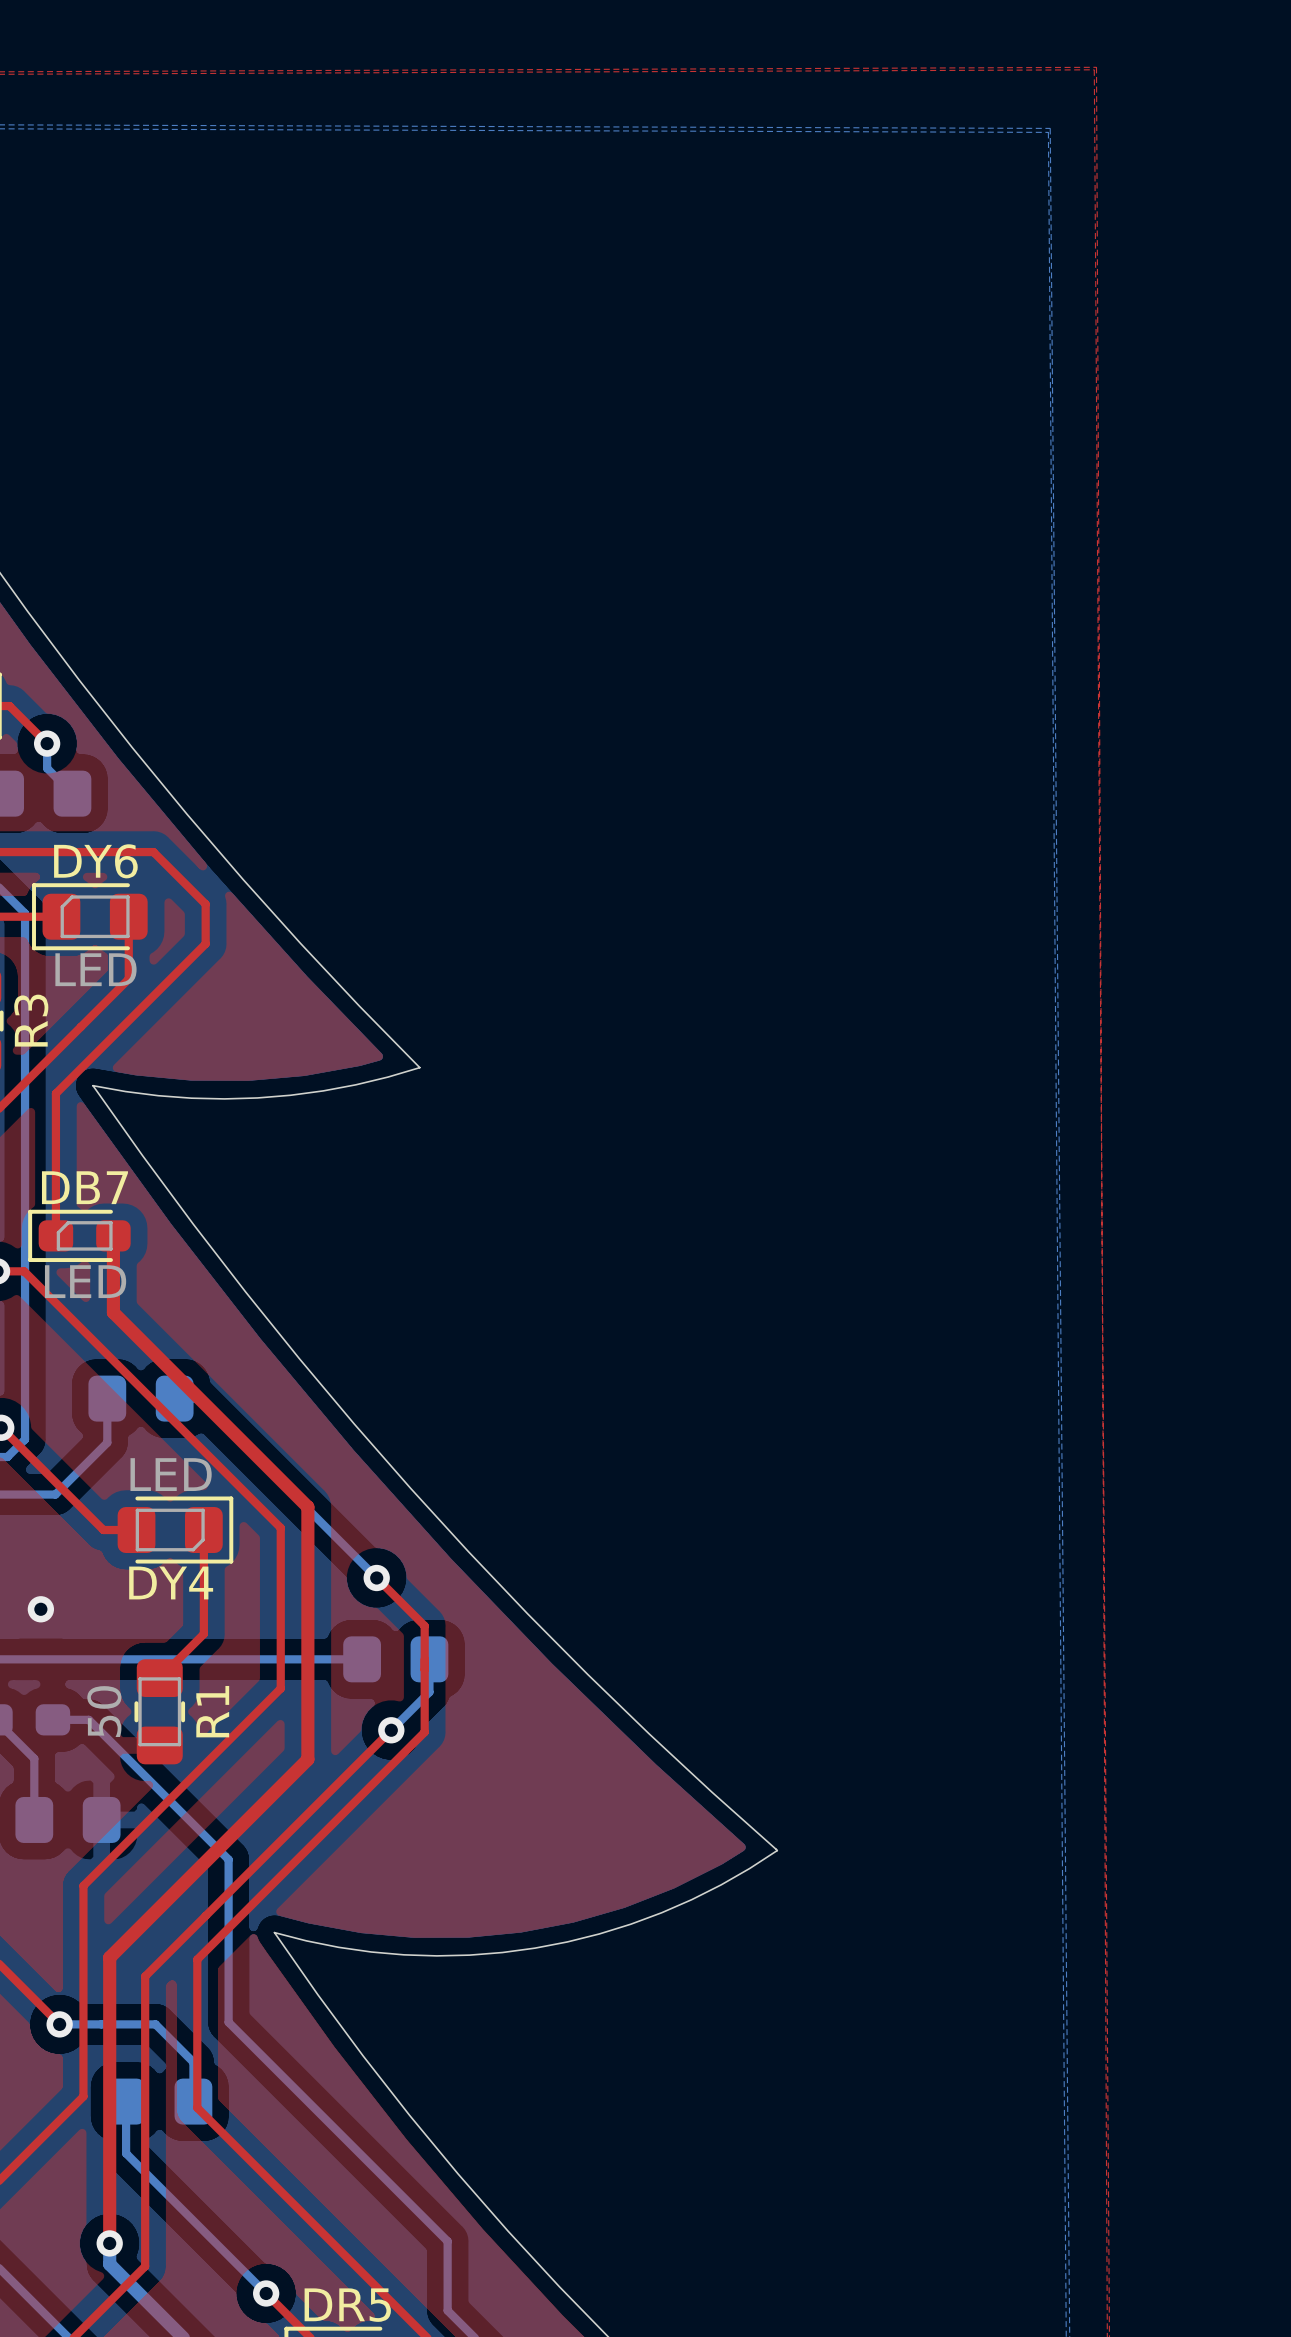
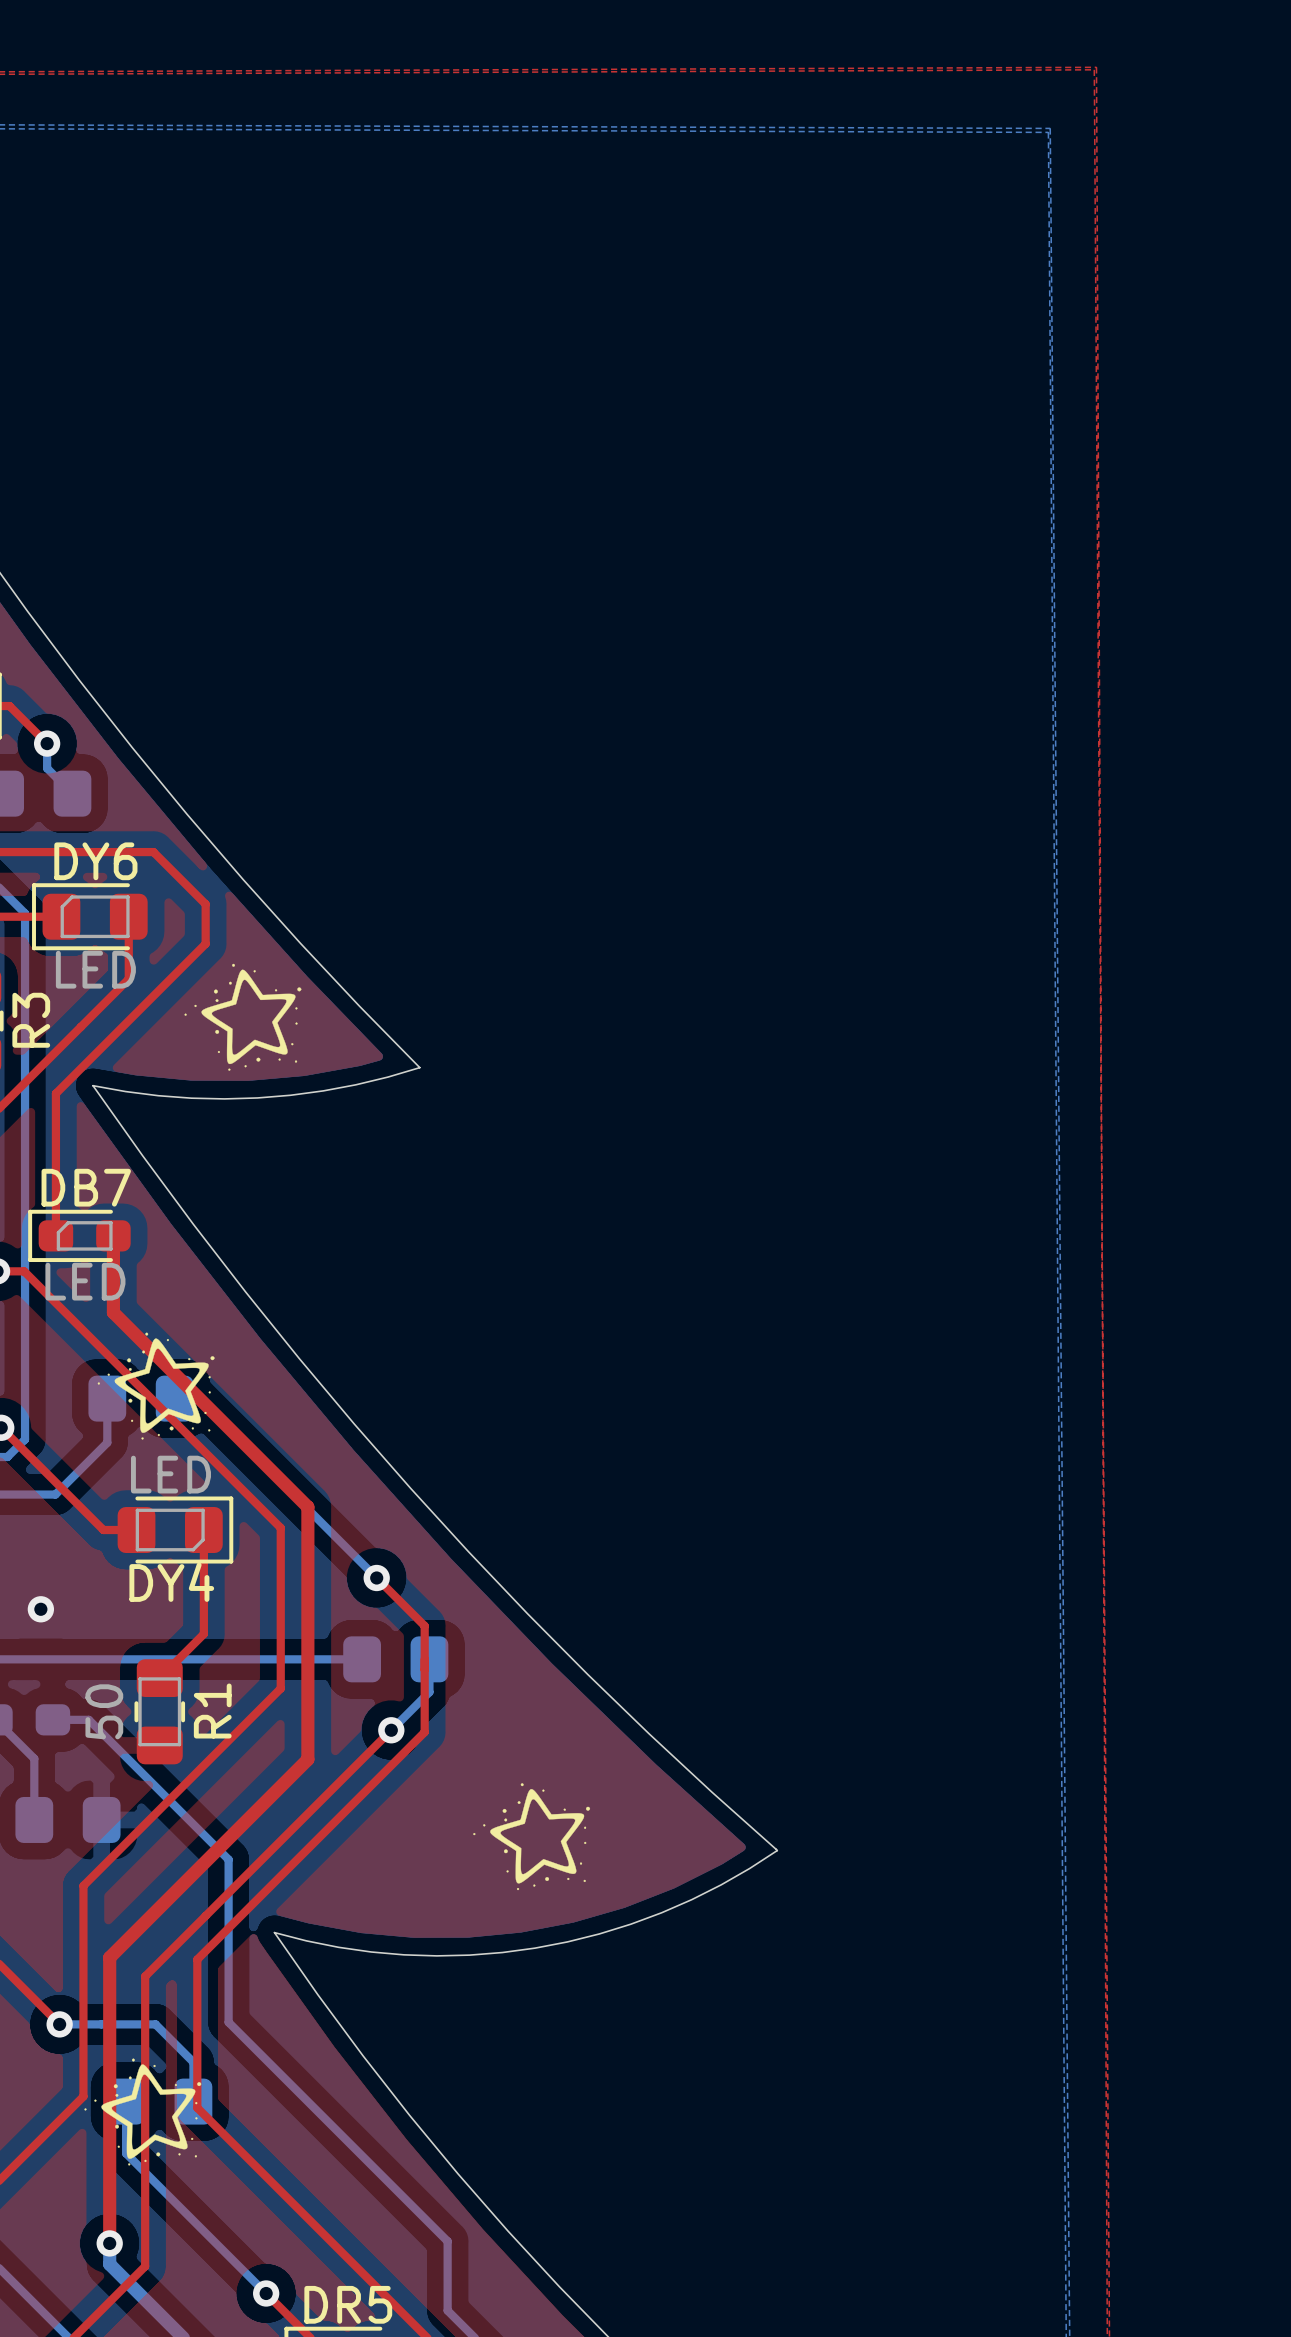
drawing: none -> [184, 963, 302, 1071]
drawing: none -> [97, 1332, 215, 1440]
drawing: none -> [473, 1783, 591, 1891]
drawing: none -> [84, 2058, 202, 2166]

